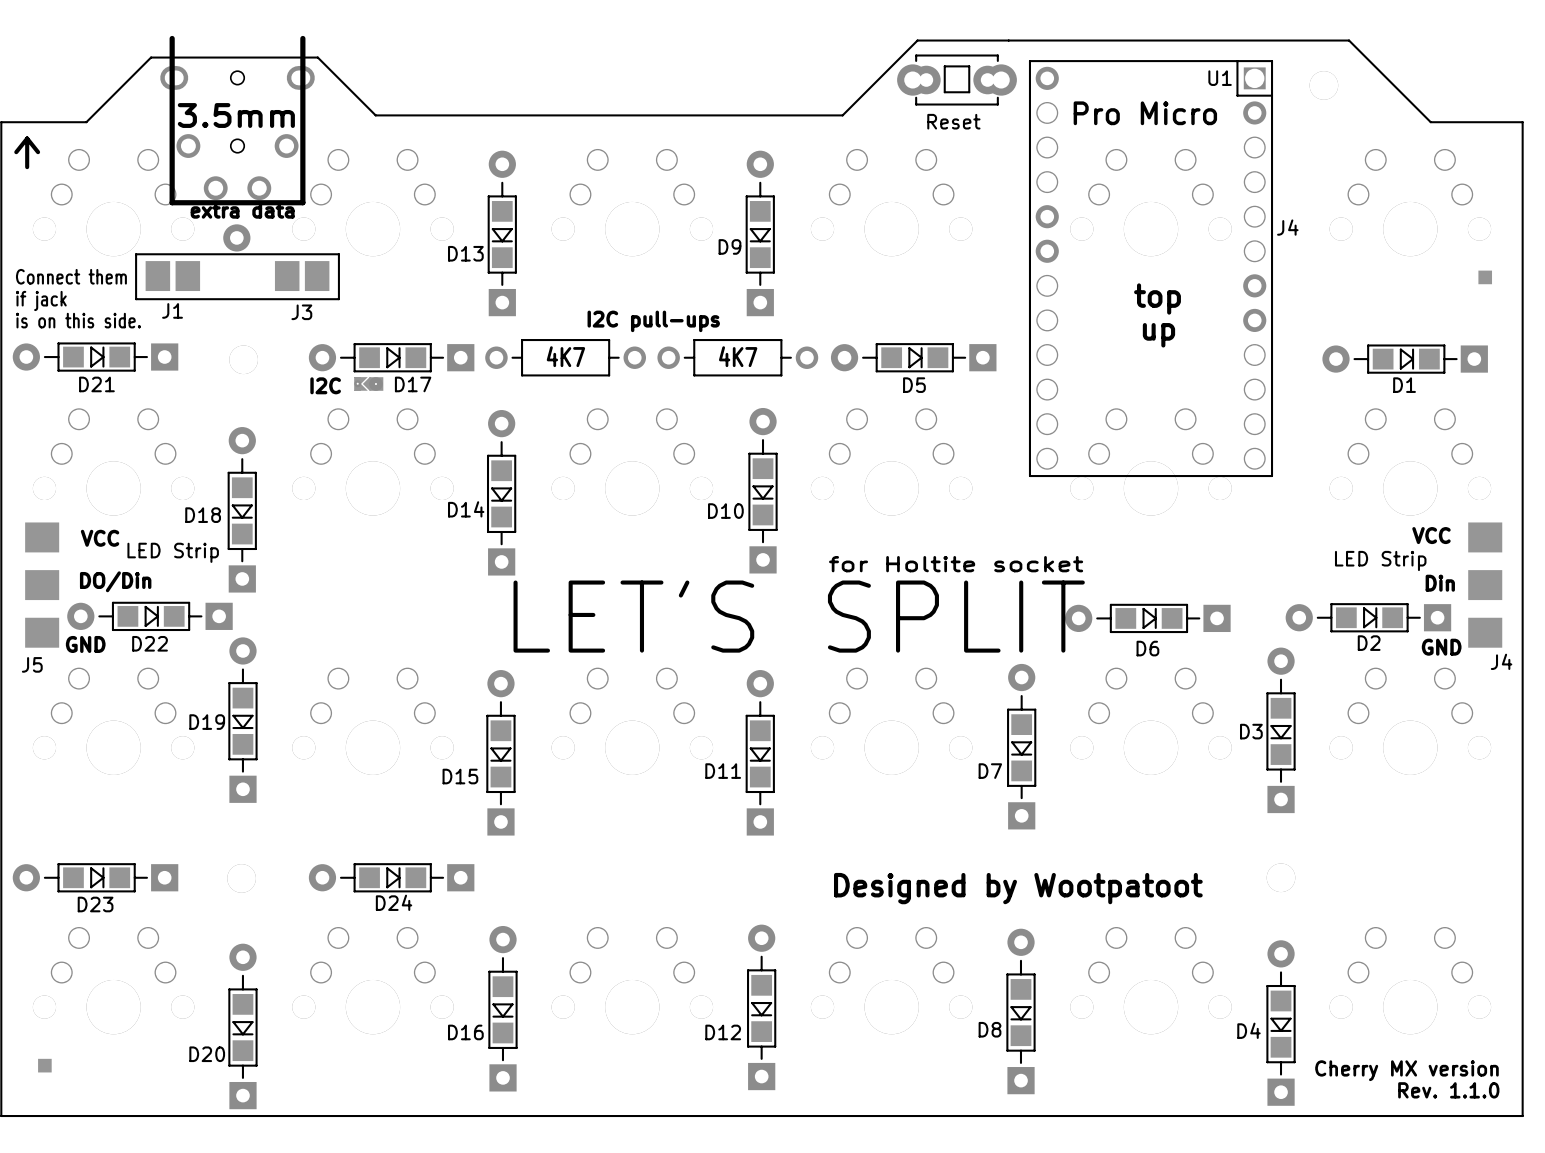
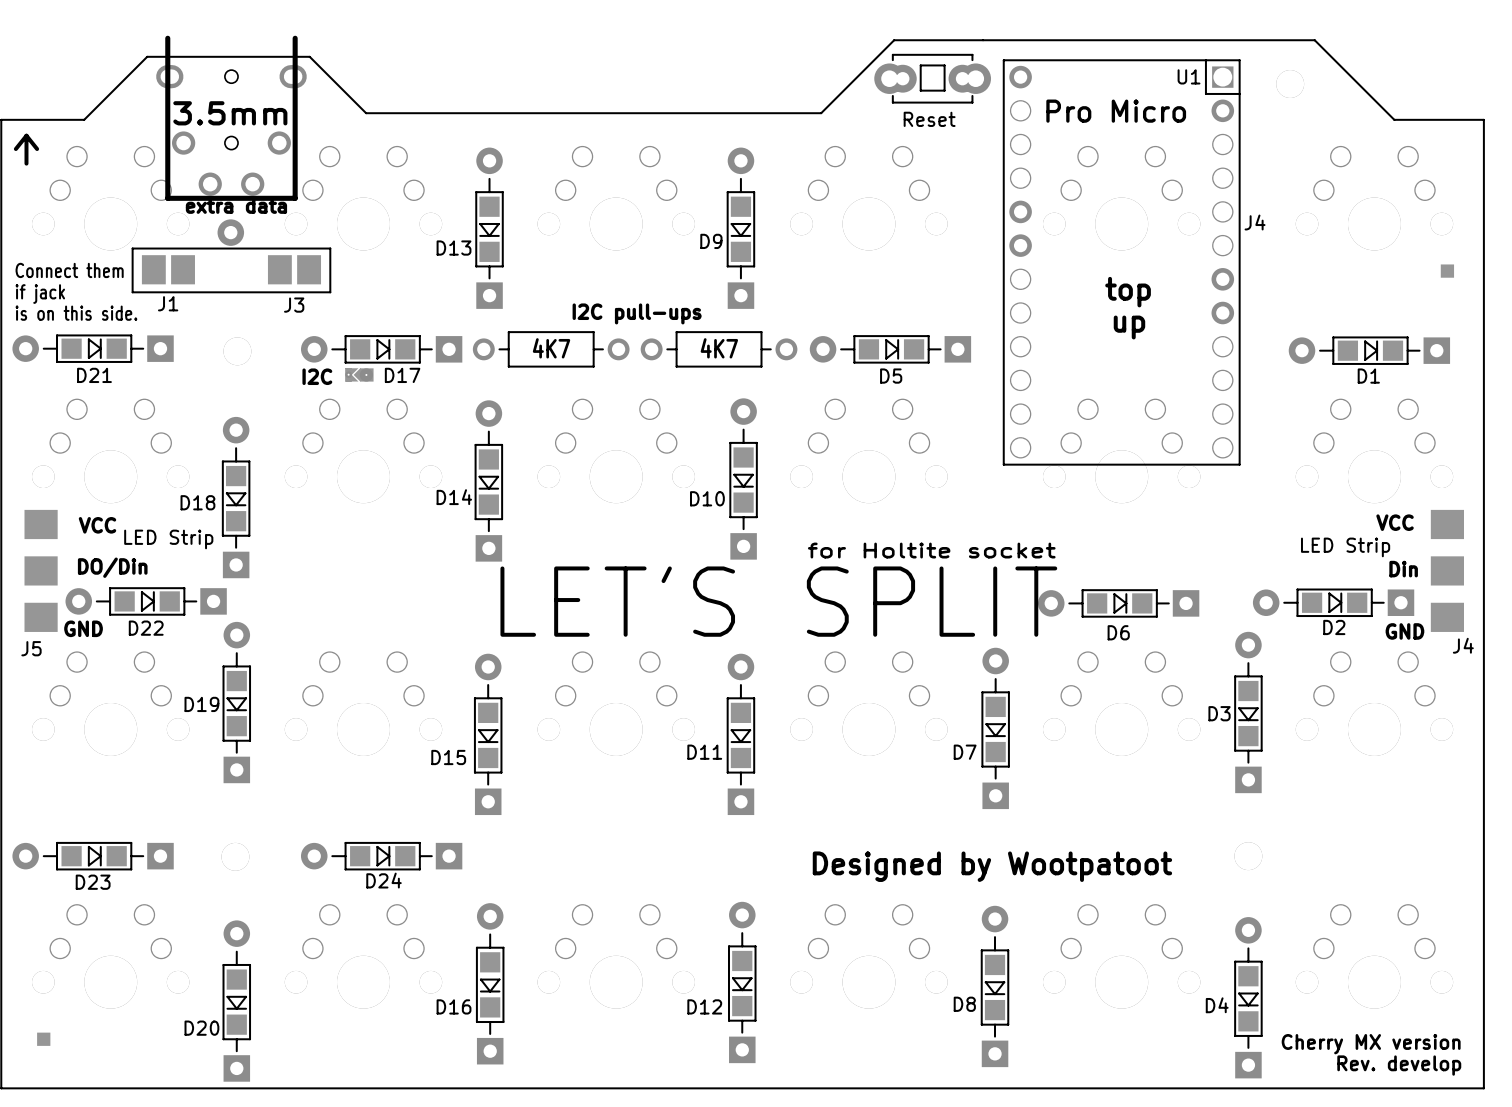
text: Rev. 1.1.0 (1448, 1090) -> Rev. develop (1399, 1065)

